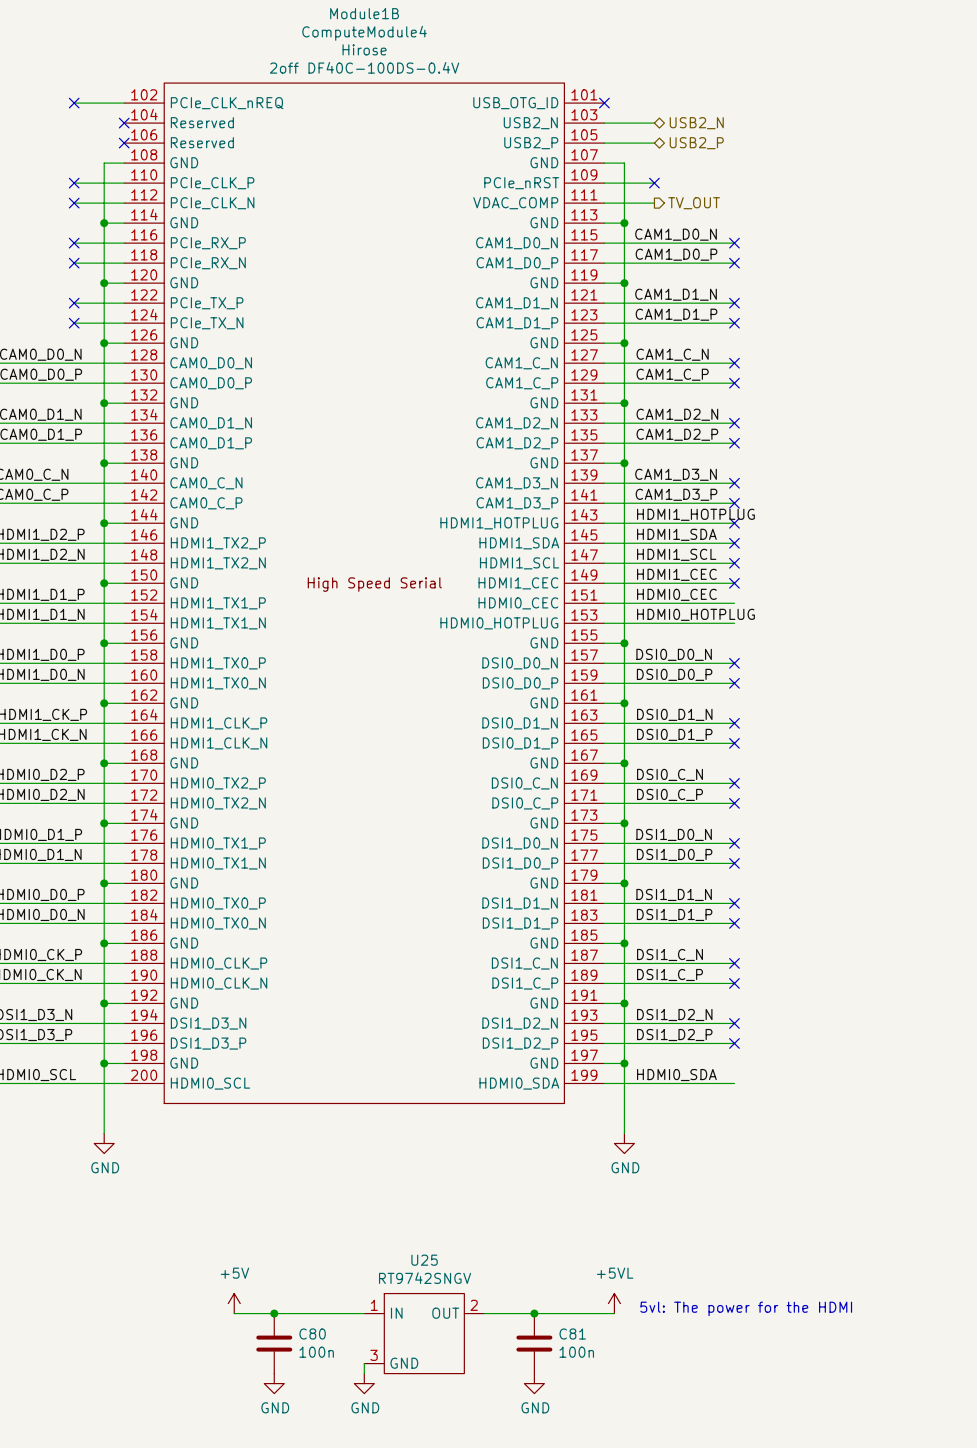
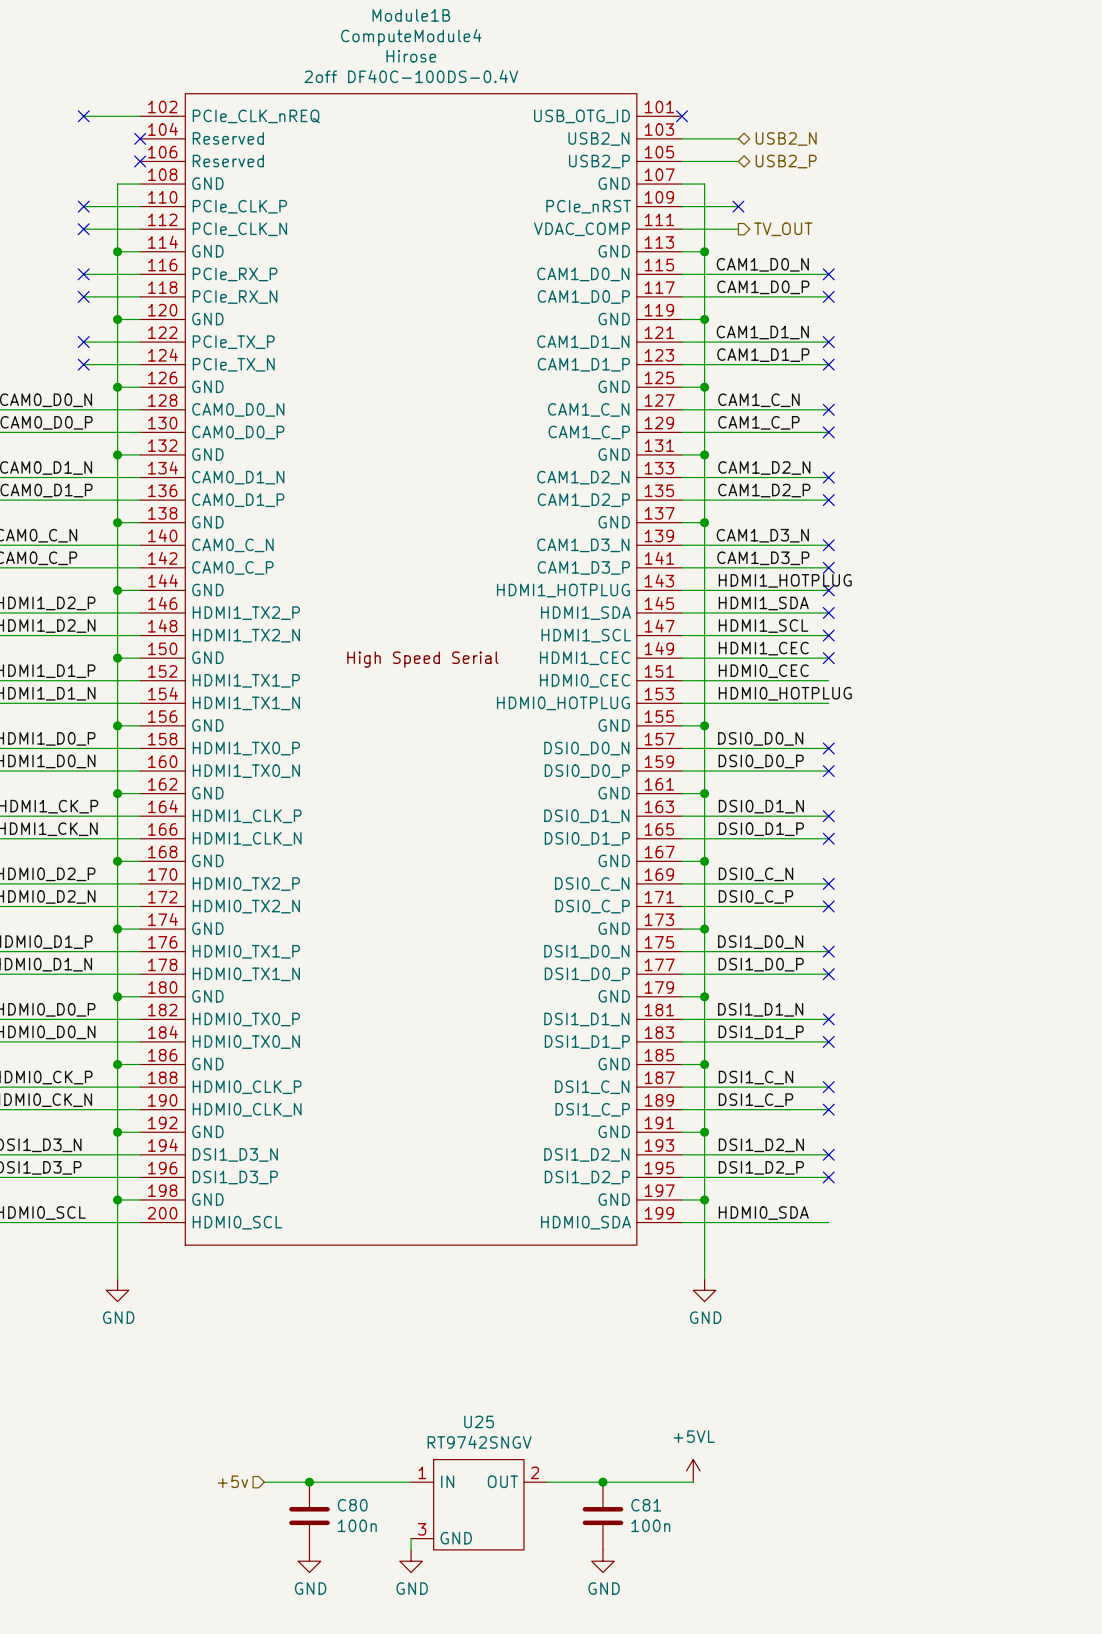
power symbol: +5V (234, 1303) -> none
text: 5vl: The power for the HDMI (746, 1308) -> none
hierarchical label: none -> +5v (232, 1481)

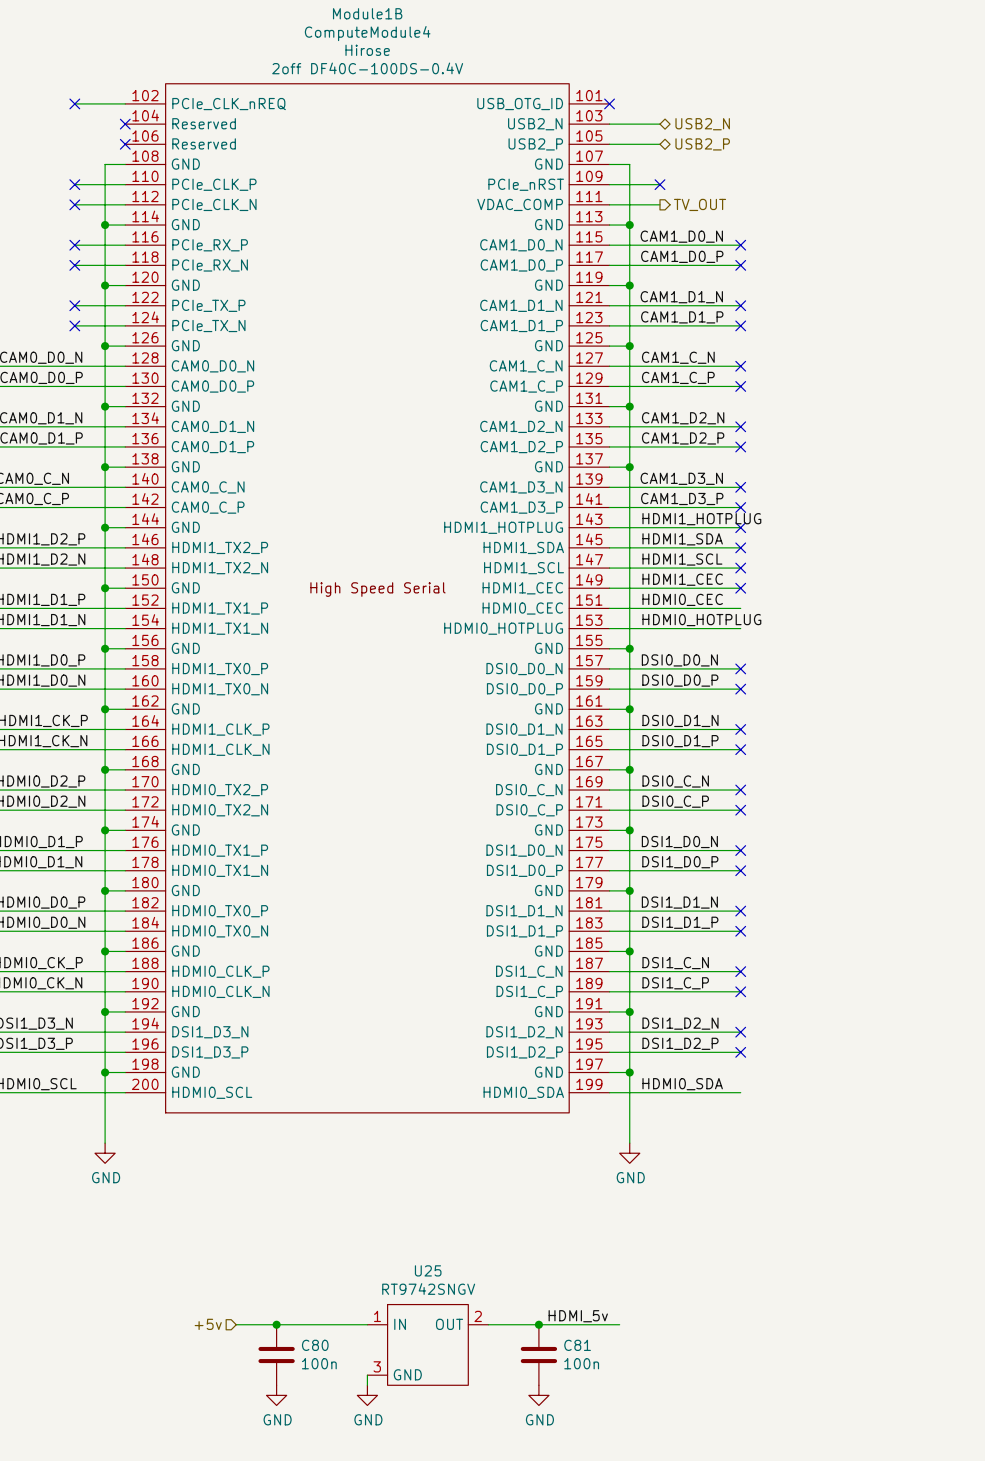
power symbol: +5VL (693, 1470) -> none
label: none -> HDMI_5v (578, 1316)

